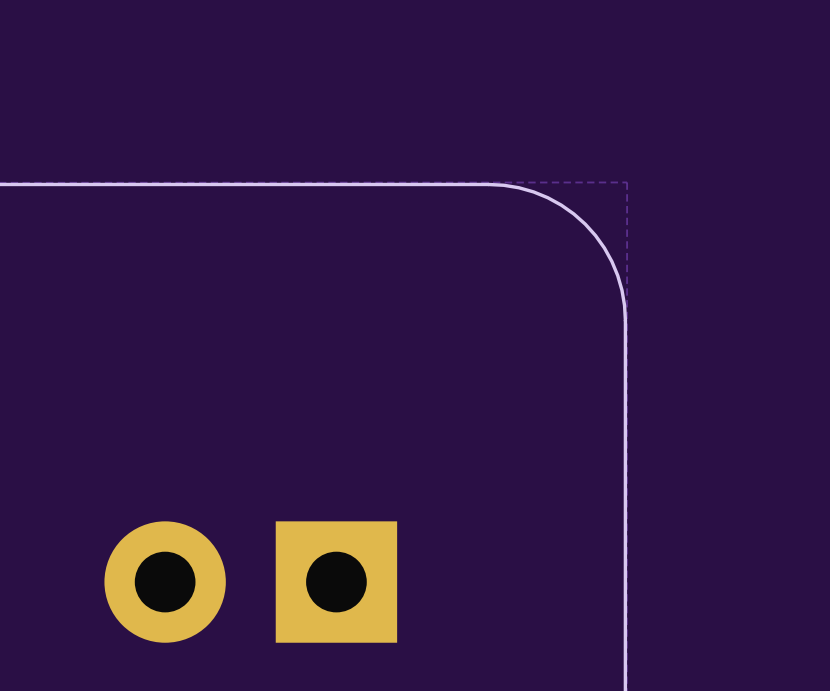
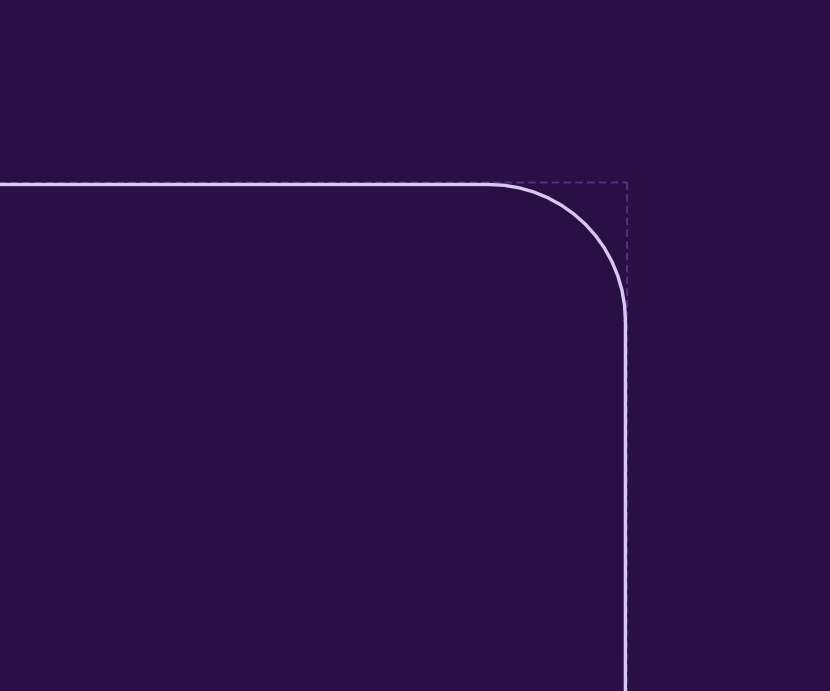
part: (250, 582) -> none

